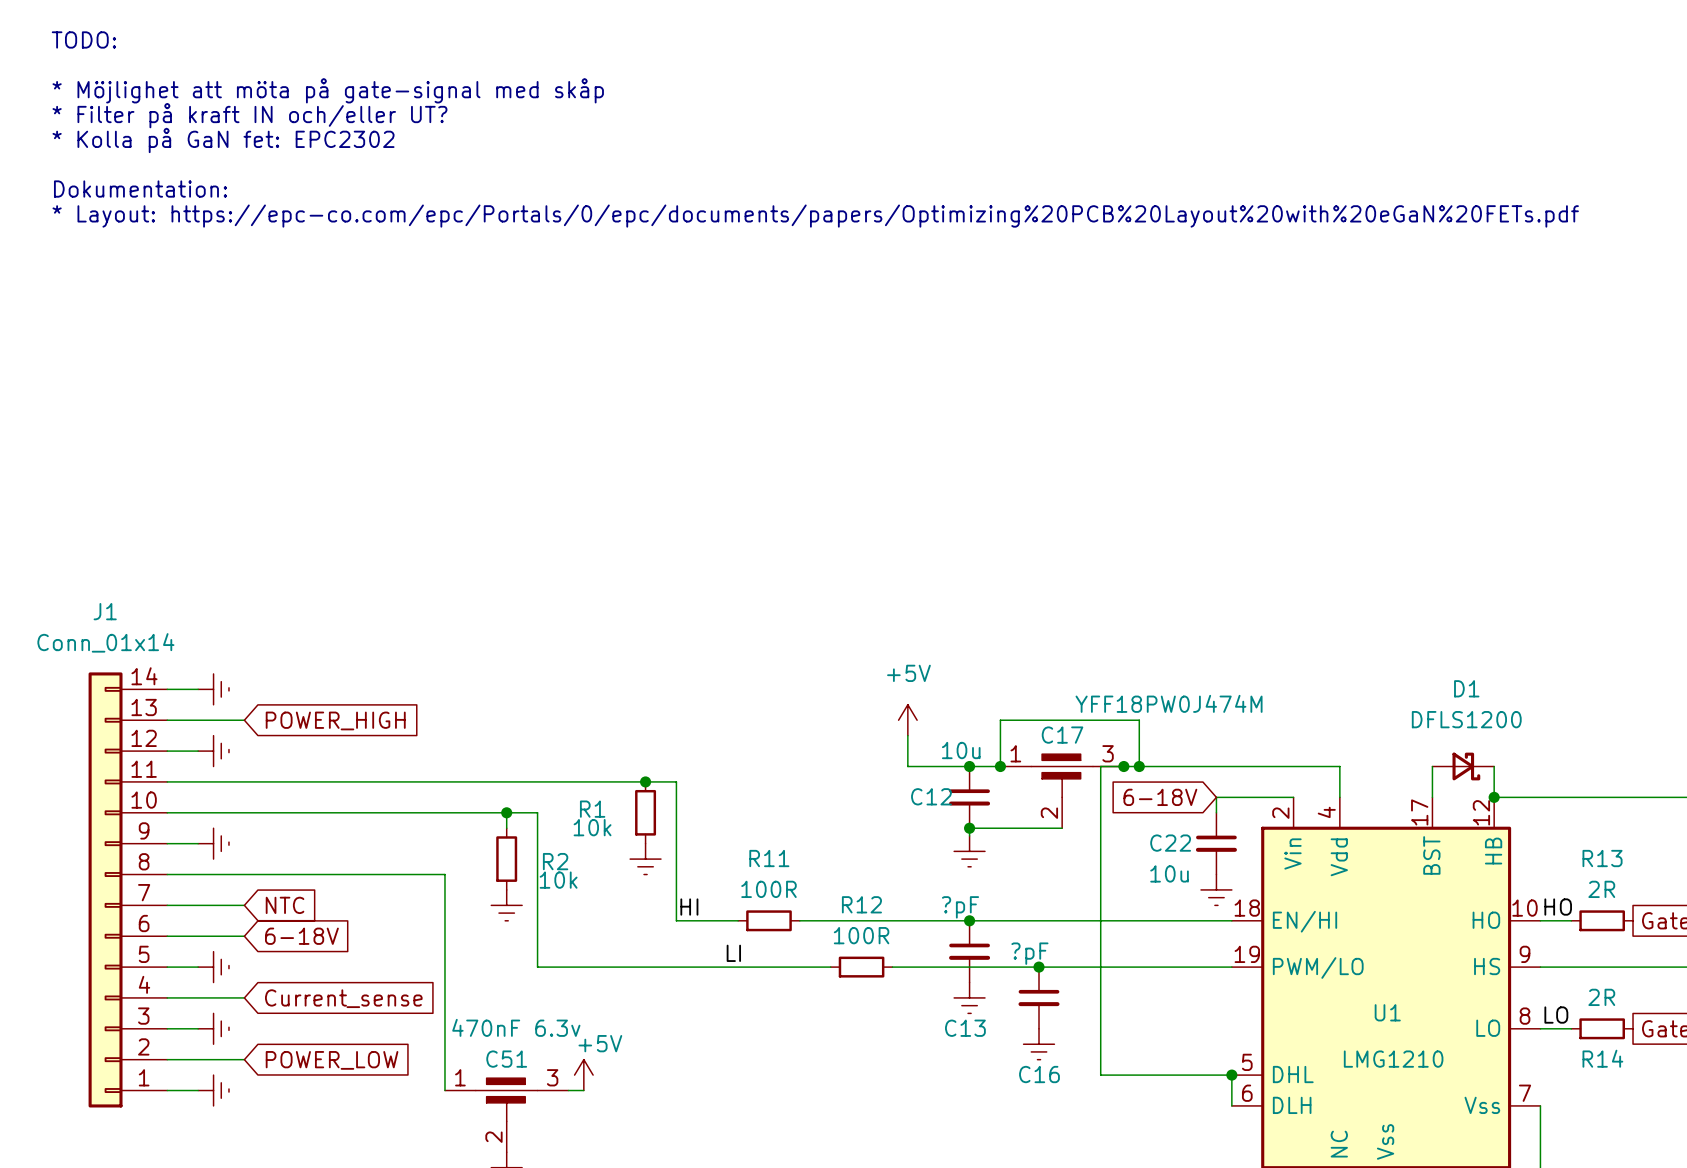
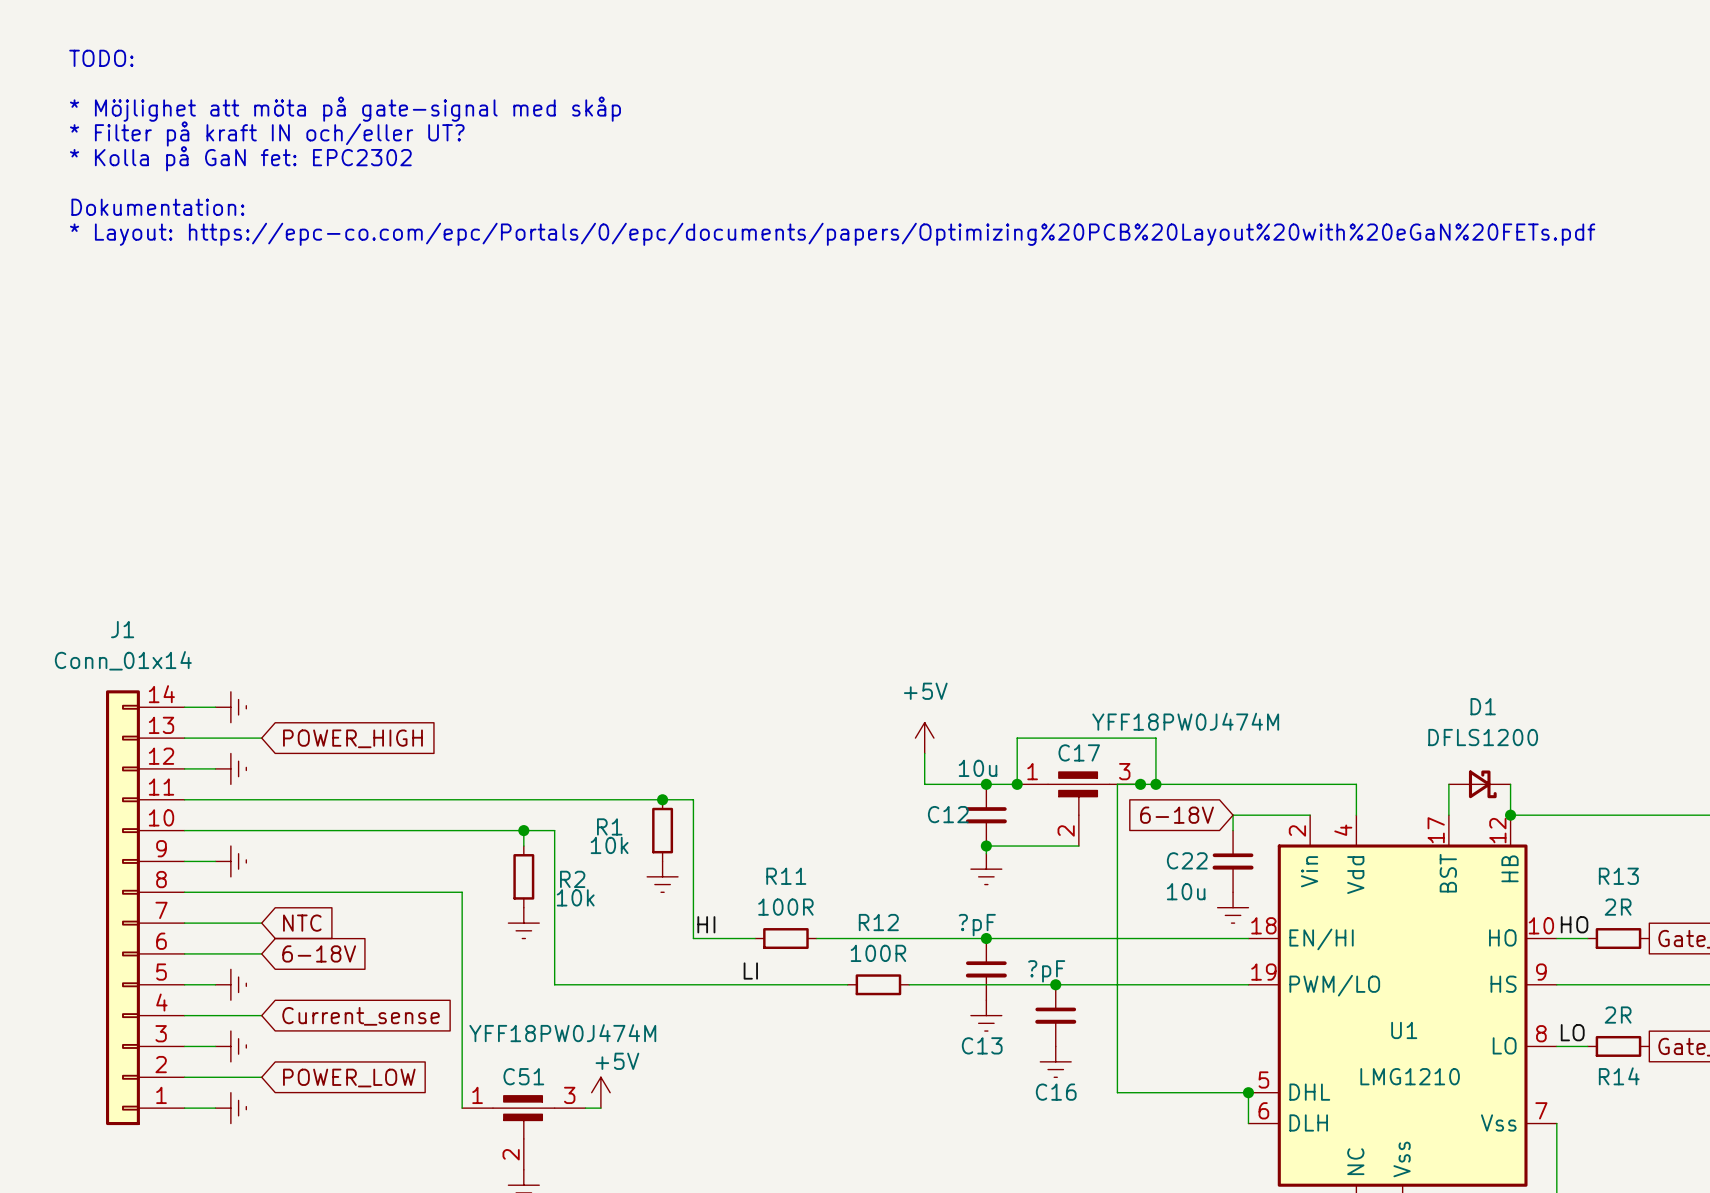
C51 value: 470nF 6.3v (516, 1027) -> YFF18PW0J474M (562, 1033)

